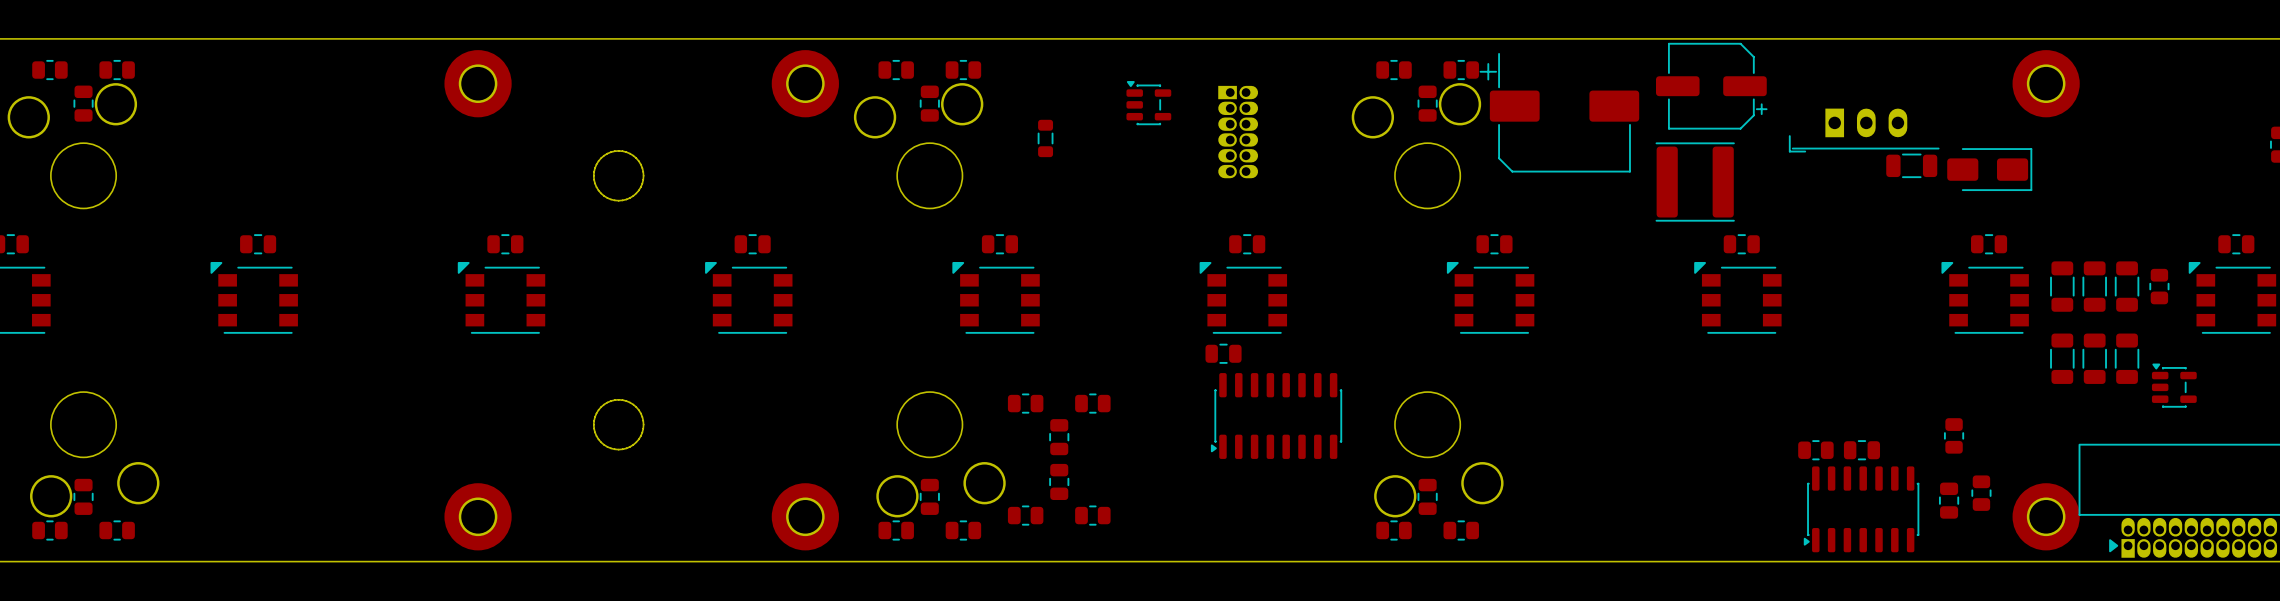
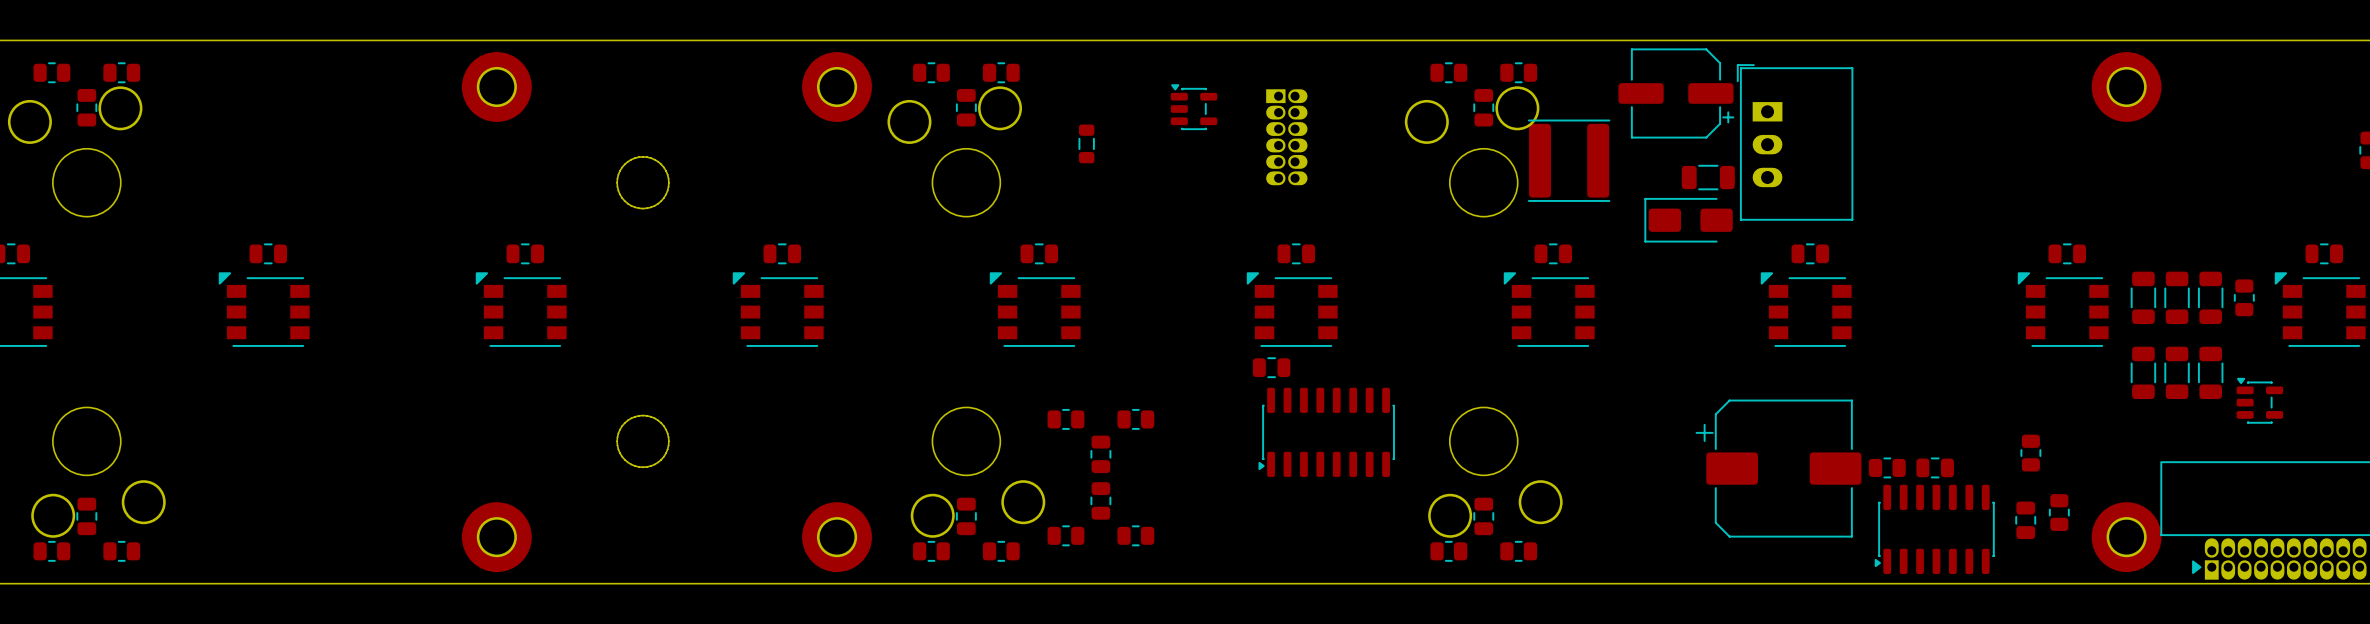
part position: (1711, 86) -> (1676, 93)
part: (1559, 112) -> none
part: (1864, 130) -> none
part: none -> (1795, 142)
part position: (1911, 165) -> (1708, 177)
part: (1989, 169) -> none
part position: (1695, 182) -> (1569, 160)
part: none -> (1688, 220)
part: none -> (1778, 468)

